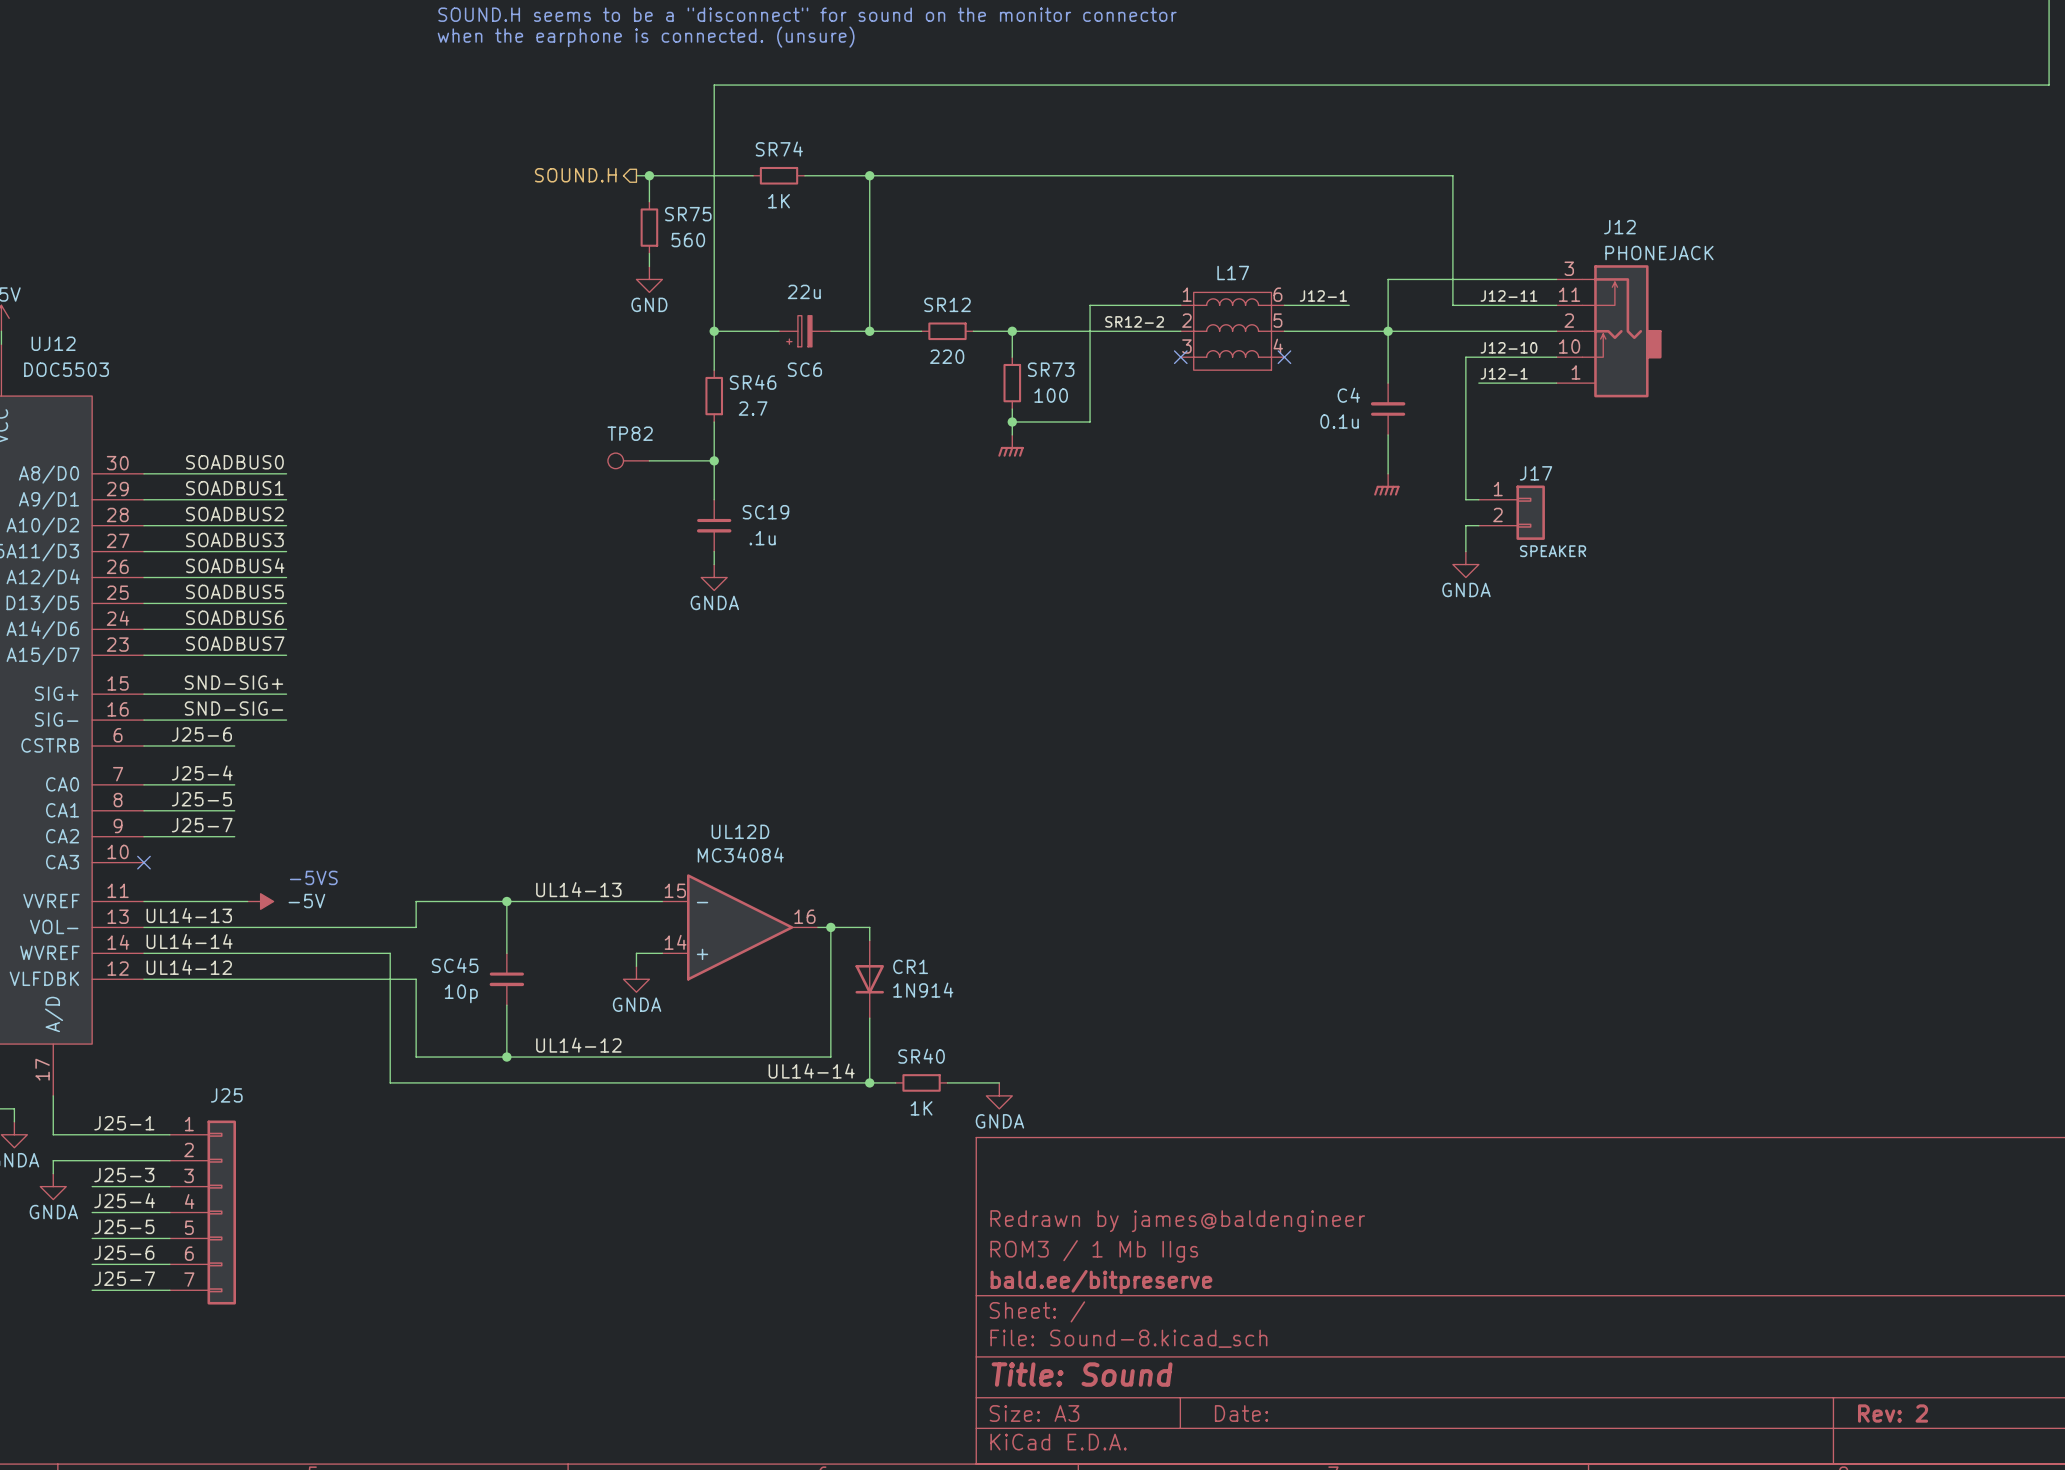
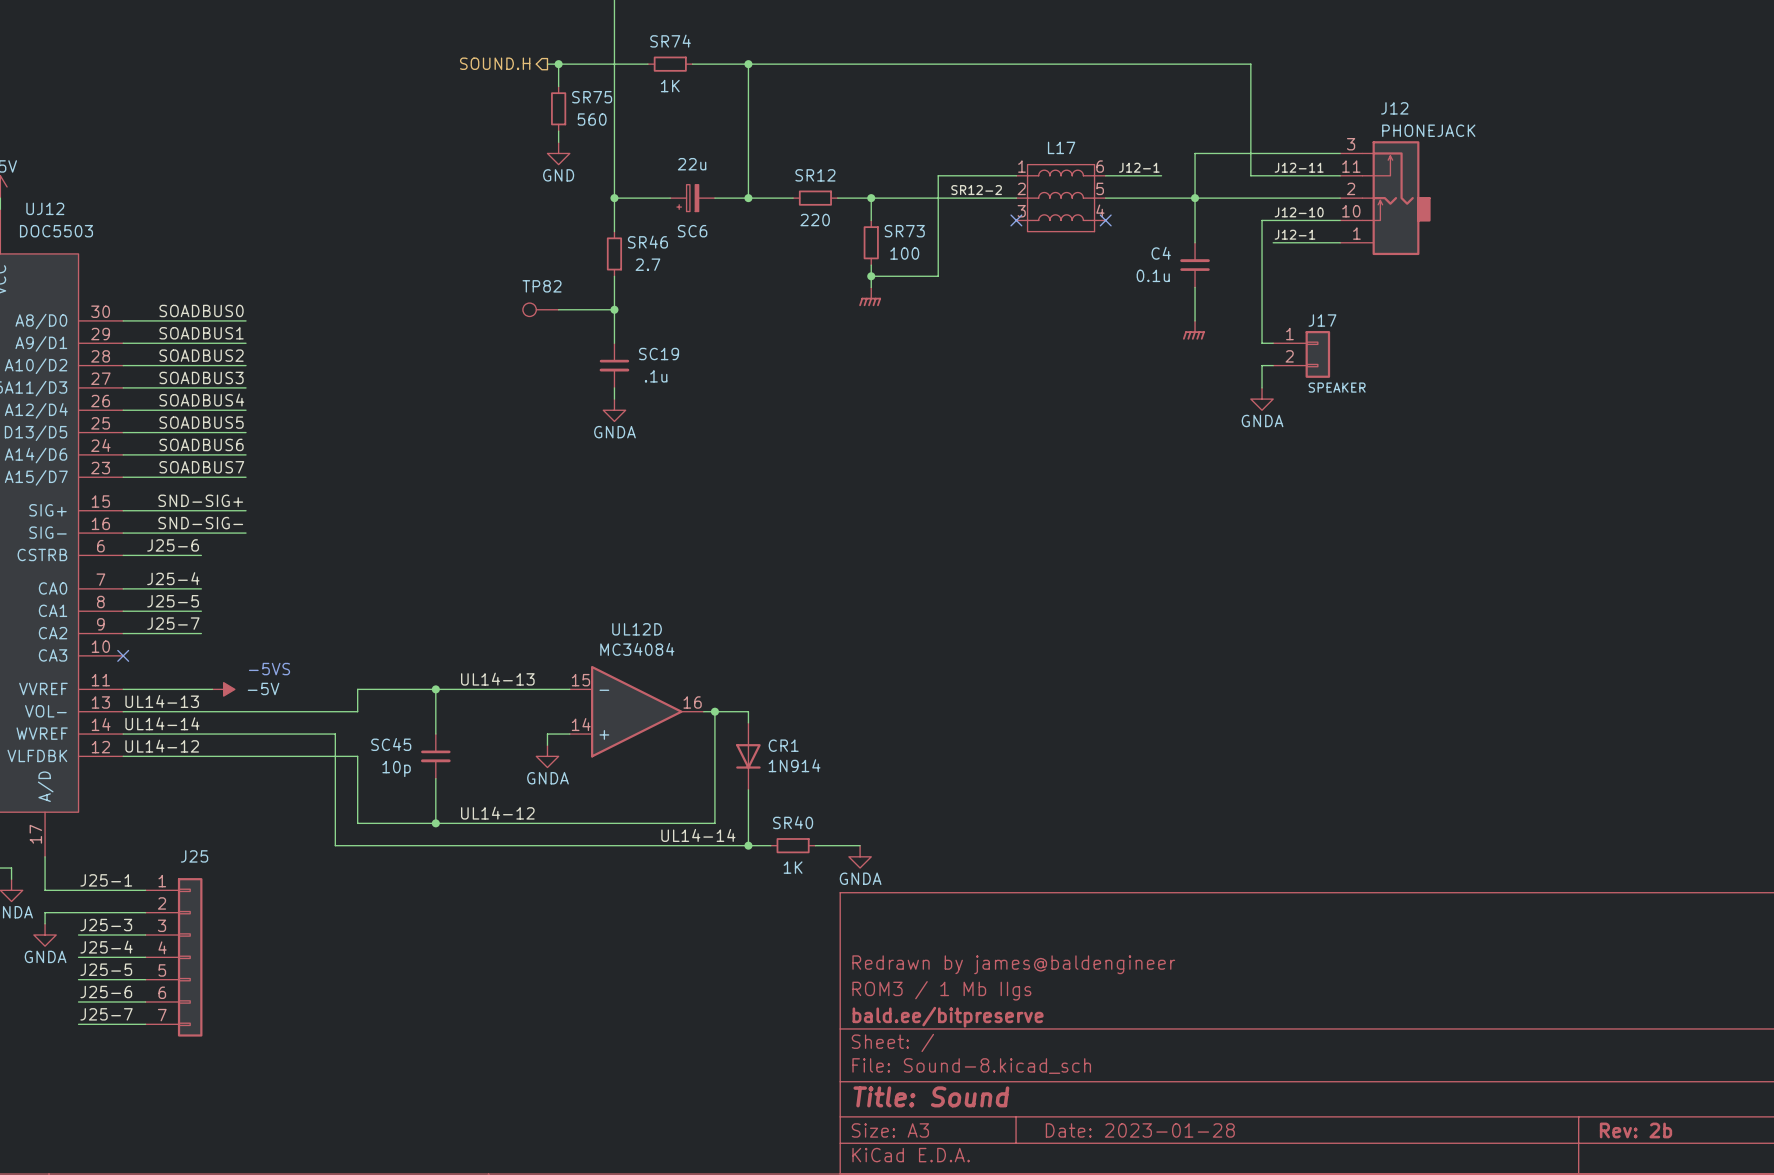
title block: Date: (1241, 1413) -> Date: 2023-01-28 (1140, 1130)
title block: Rev: 2 (1893, 1413) -> Rev: 2b (1635, 1130)

